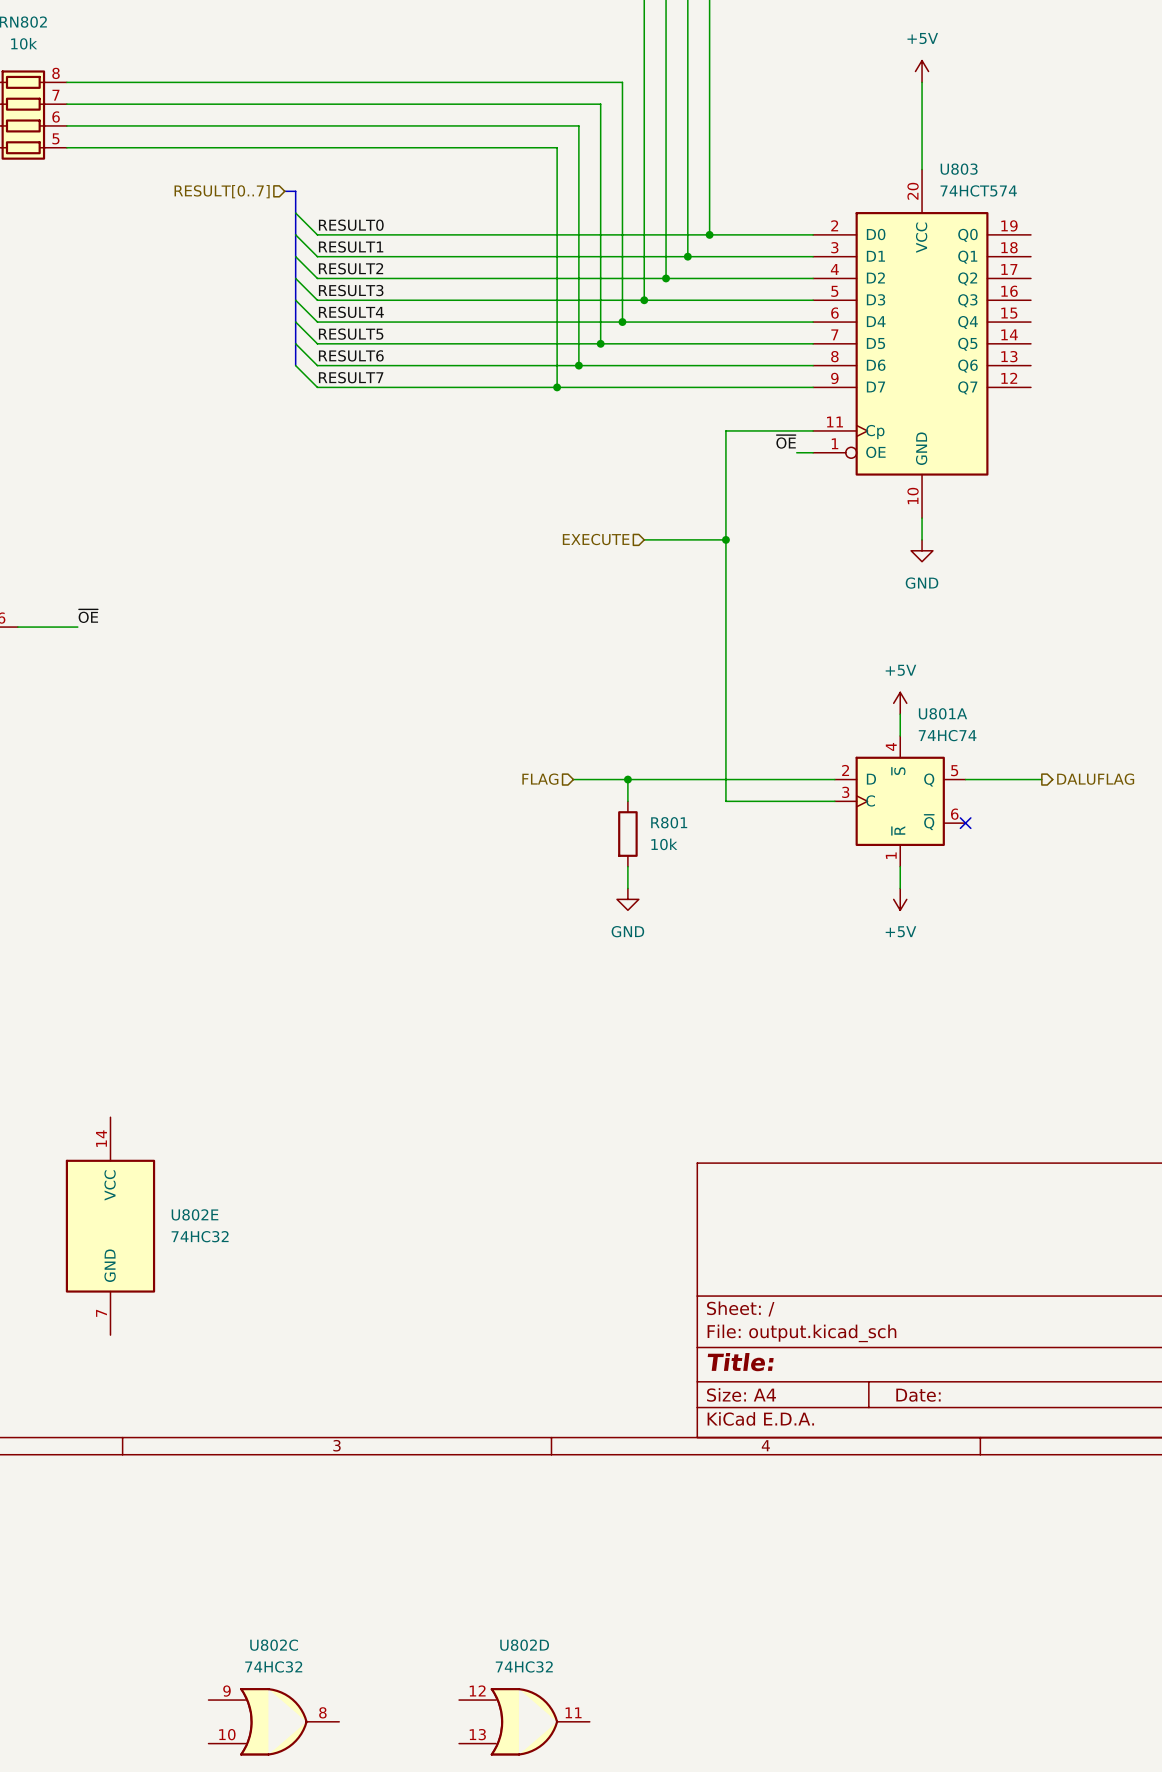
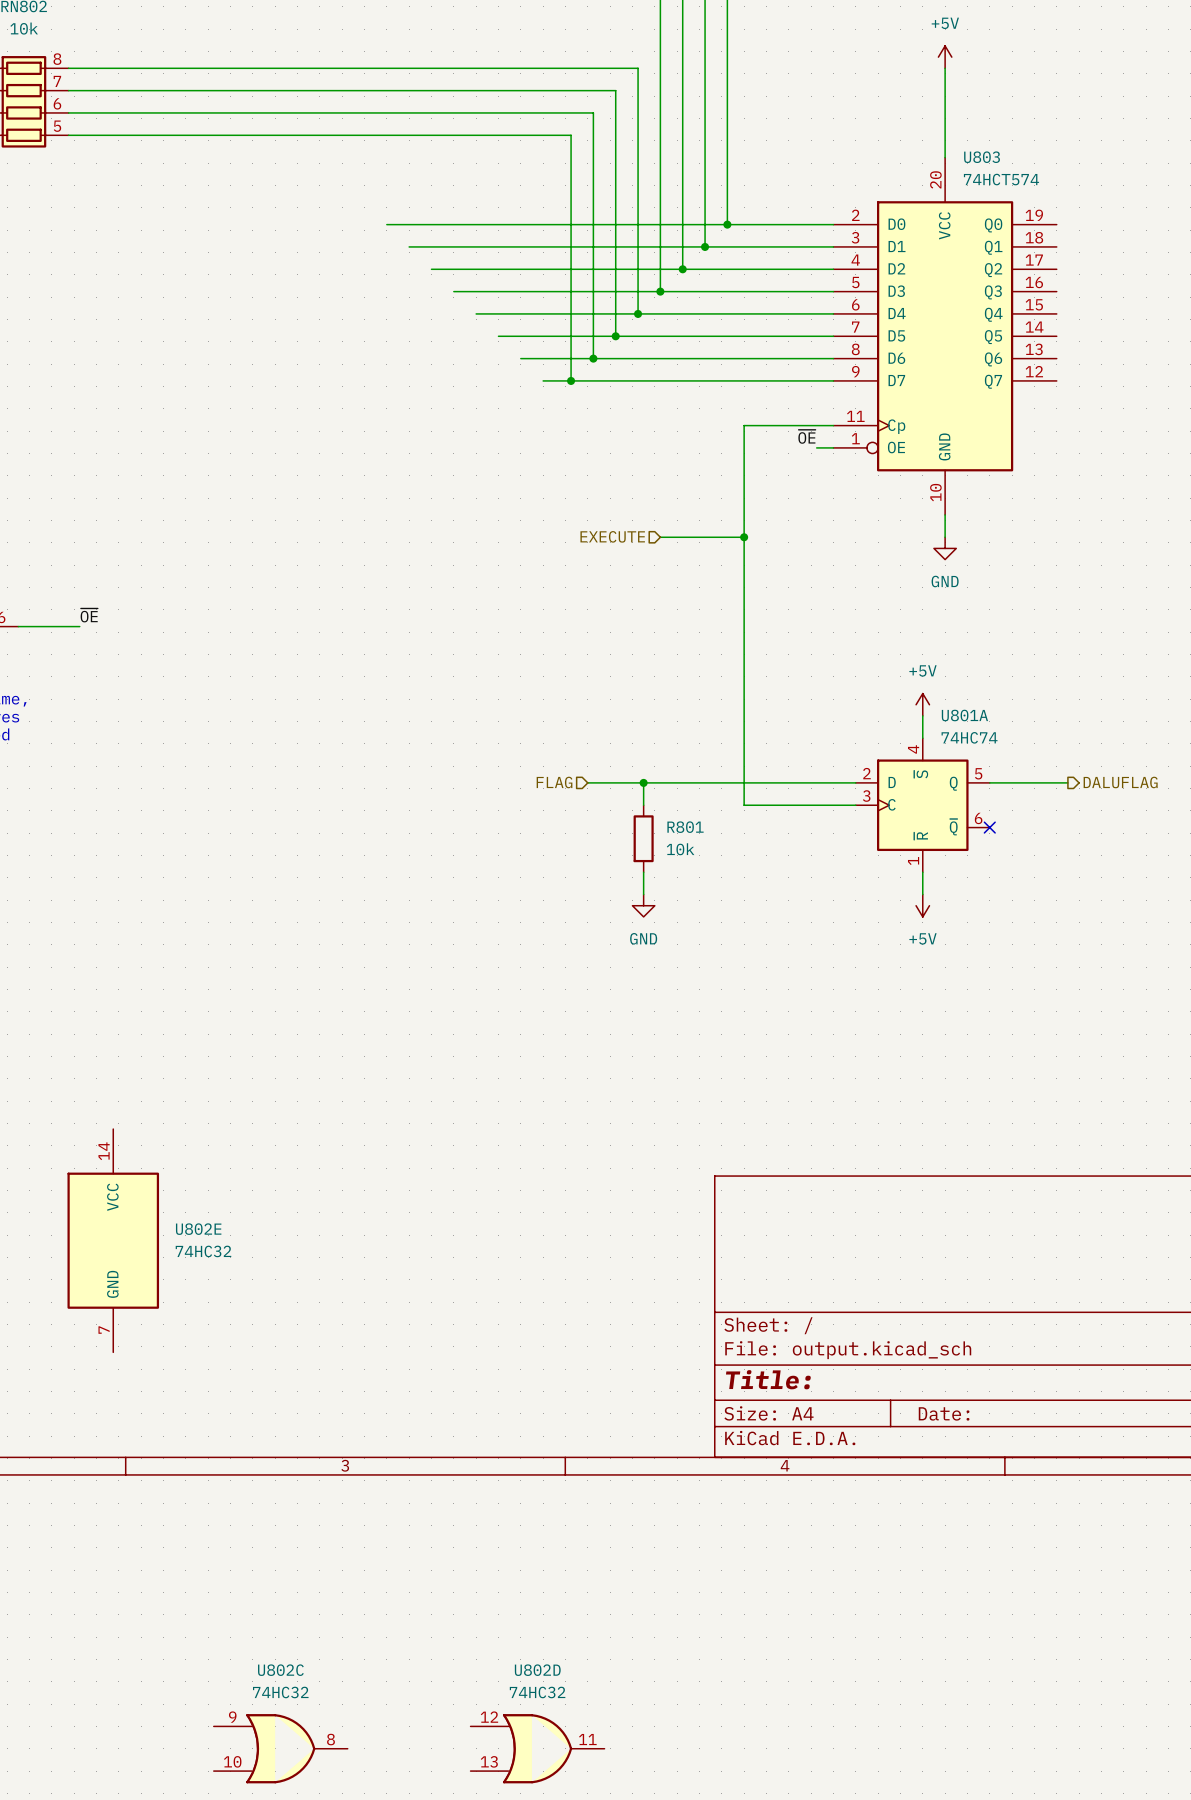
hierarchical label: RESULT[0..7] (222, 191) -> none
bus: (284, 191) (295, 191) (295, 365) -> none
wire: (295, 213) (317, 234) (377, 234) -> none
label: RESULT0 (351, 225) -> none
wire: (295, 234) (317, 256) -> none
label: RESULT1 (351, 246) -> none
wire: (295, 256) (317, 278) (420, 278) -> none
wire: (317, 256) (399, 256) -> none
label: RESULT2 (351, 268) -> none
wire: (295, 278) (317, 300) (442, 300) -> none
label: RESULT3 (351, 290) -> none
wire: (295, 300) (317, 322) -> none
label: RESULT4 (351, 312) -> none
wire: (295, 322) (317, 343) (486, 343) -> none
wire: (317, 322) (464, 322) -> none
label: RESULT5 (351, 334) -> none
wire: (295, 343) (317, 365) (508, 365) -> none
label: RESULT6 (351, 355) -> none
wire: (295, 365) (317, 387) -> none
label: RESULT7 (351, 377) -> none
wire: (317, 387) (529, 387) -> none

